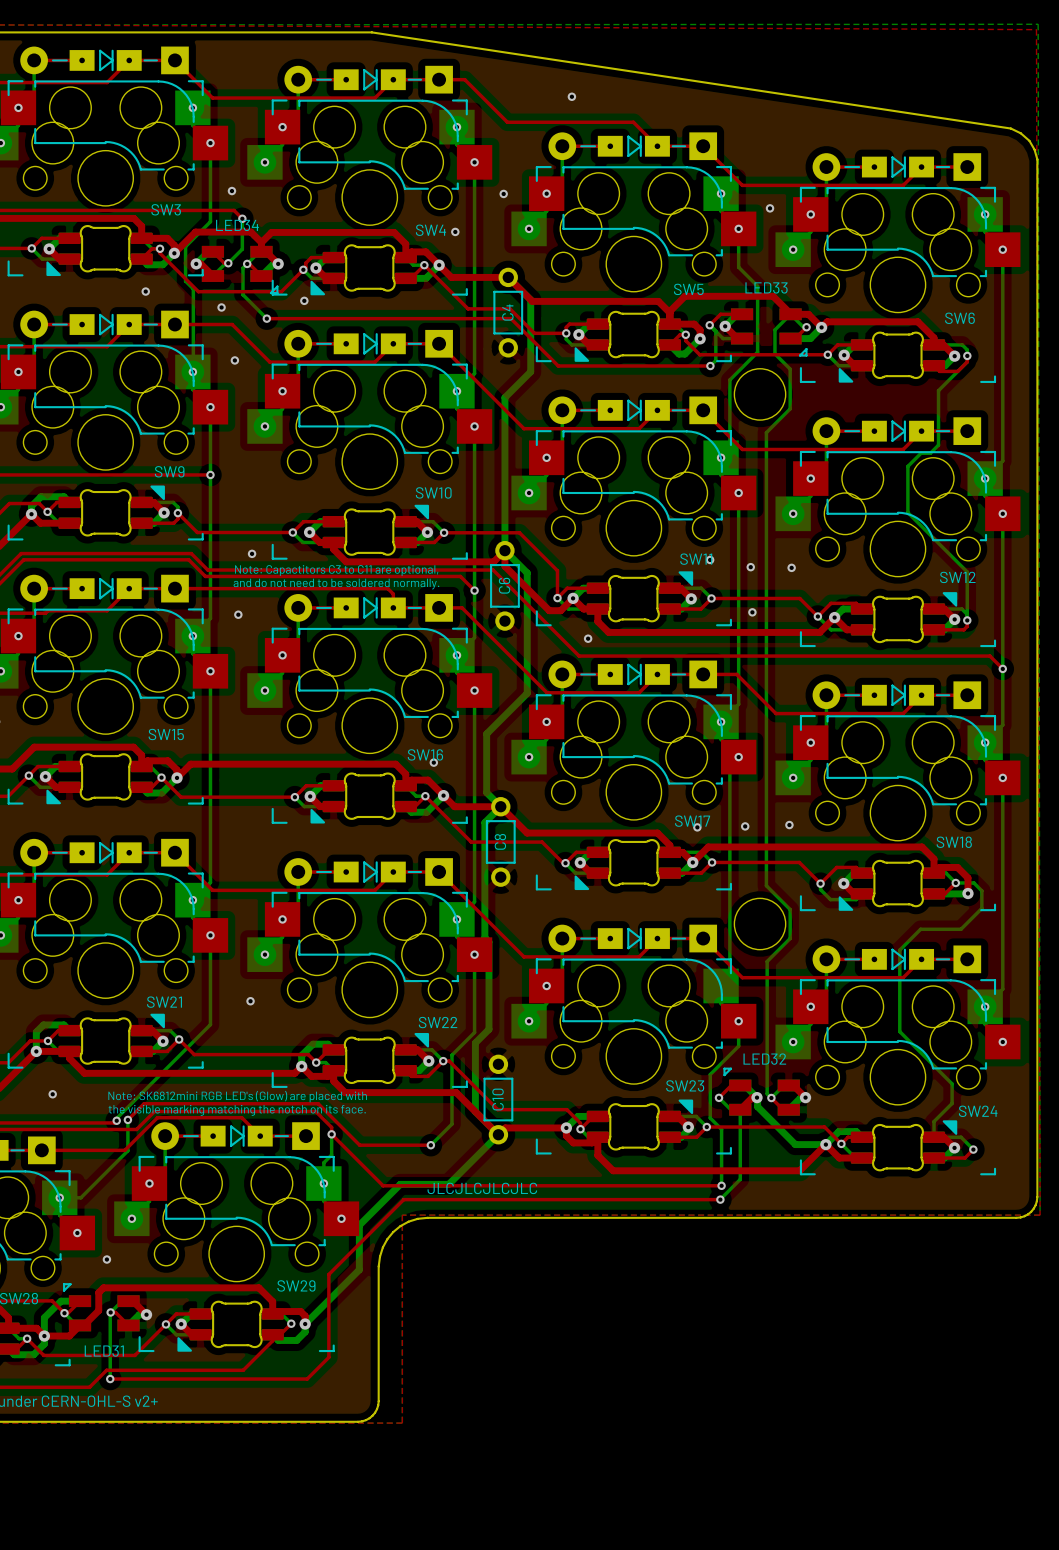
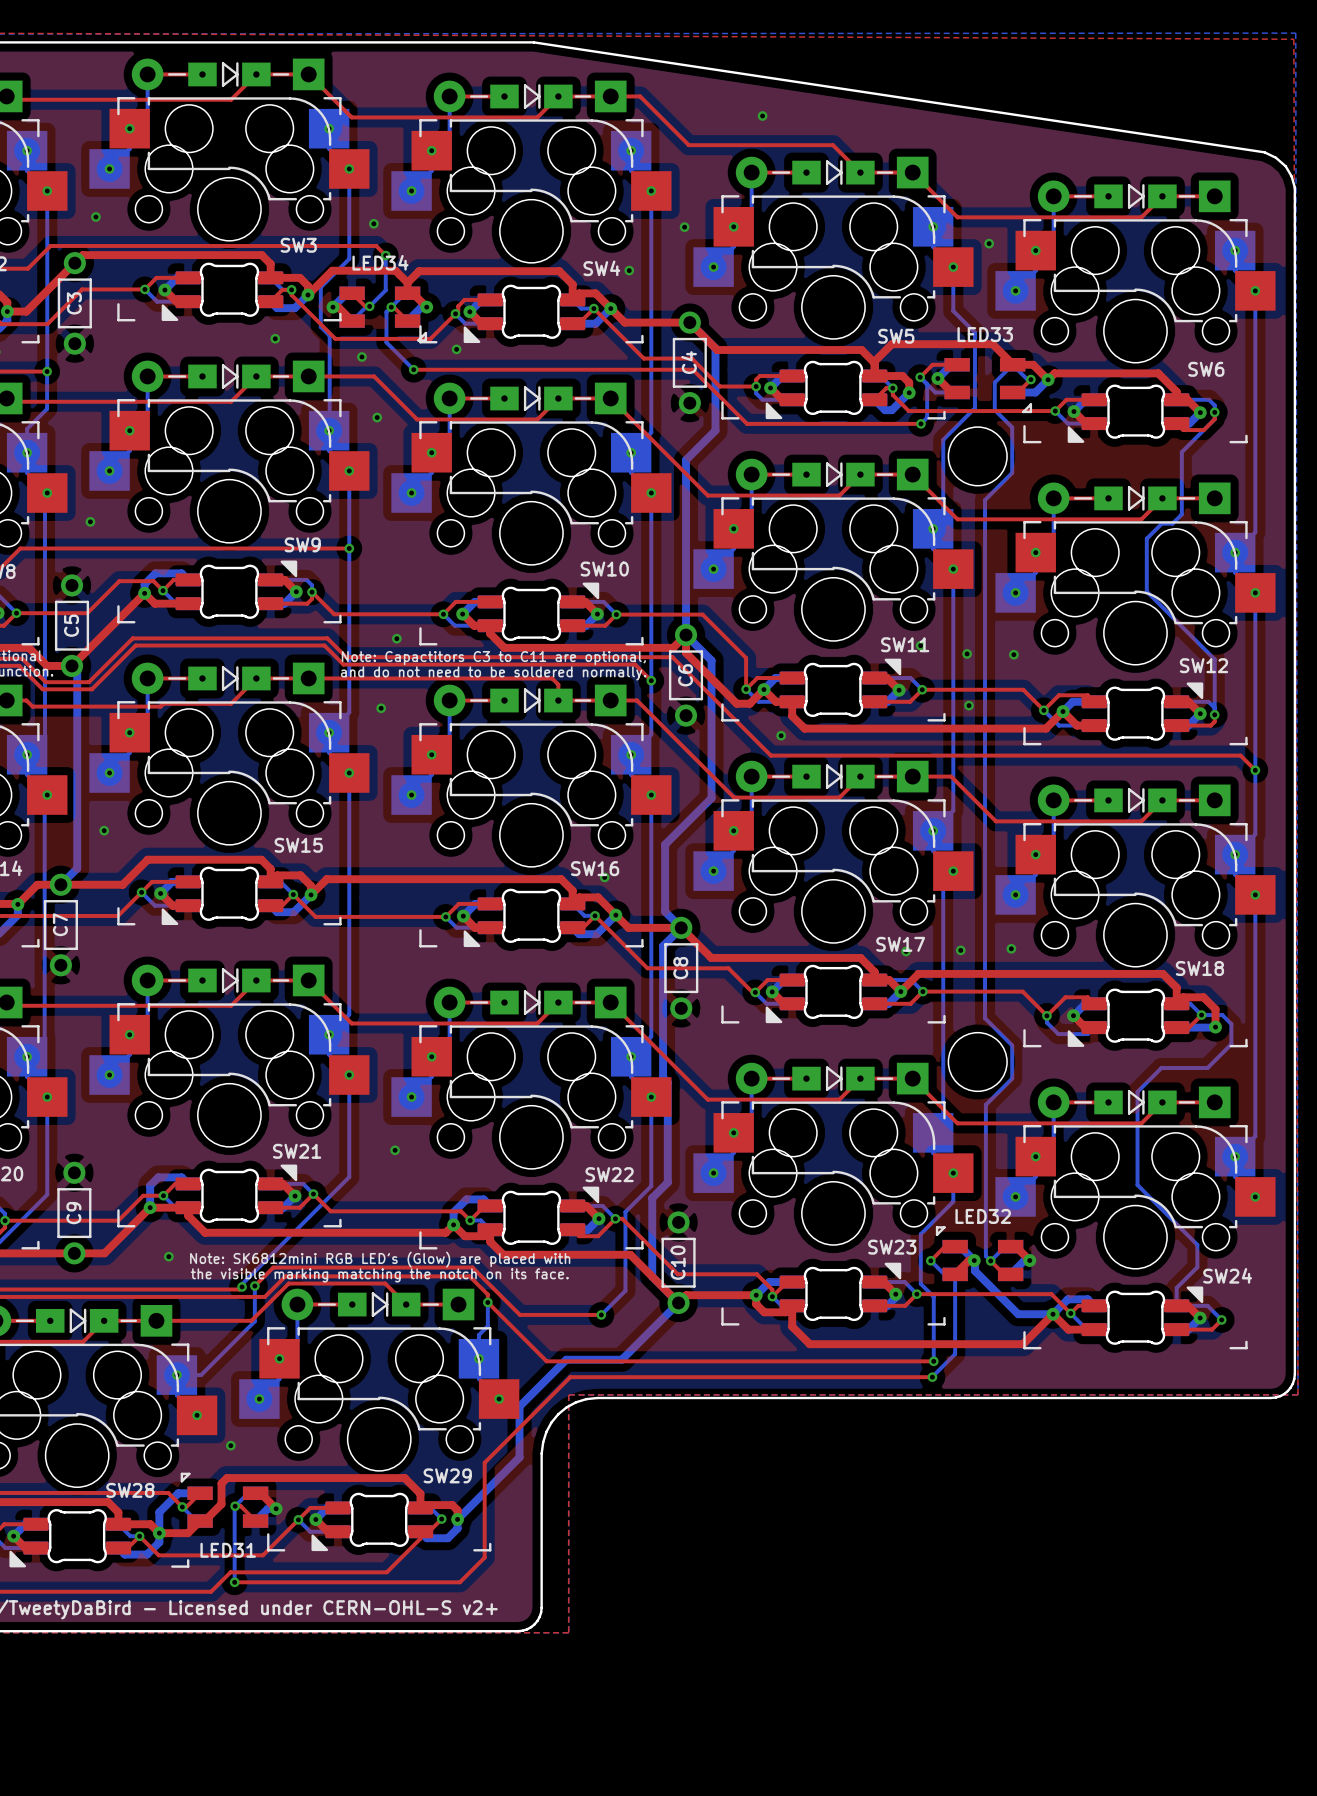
text: JLCJLCJLCJLC (482, 1188) -> none

